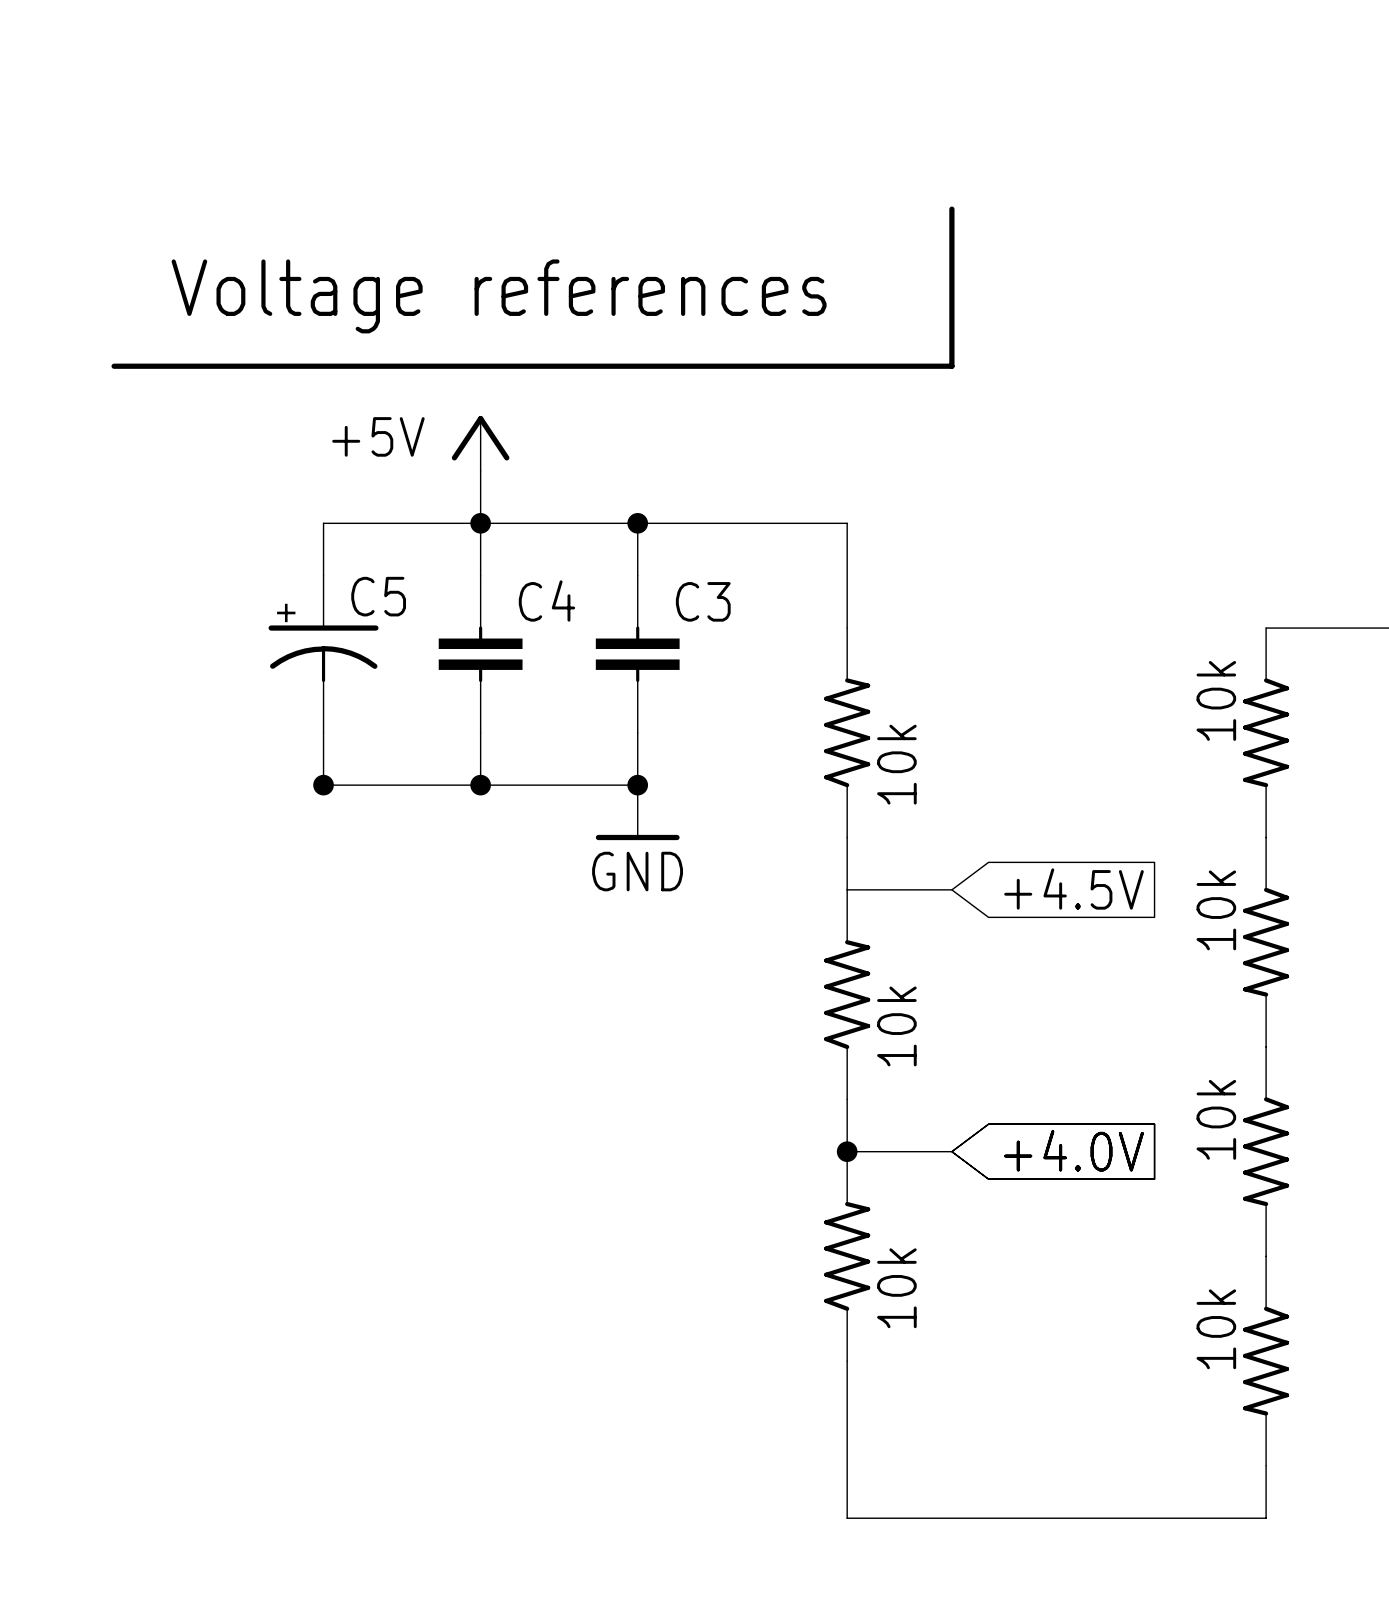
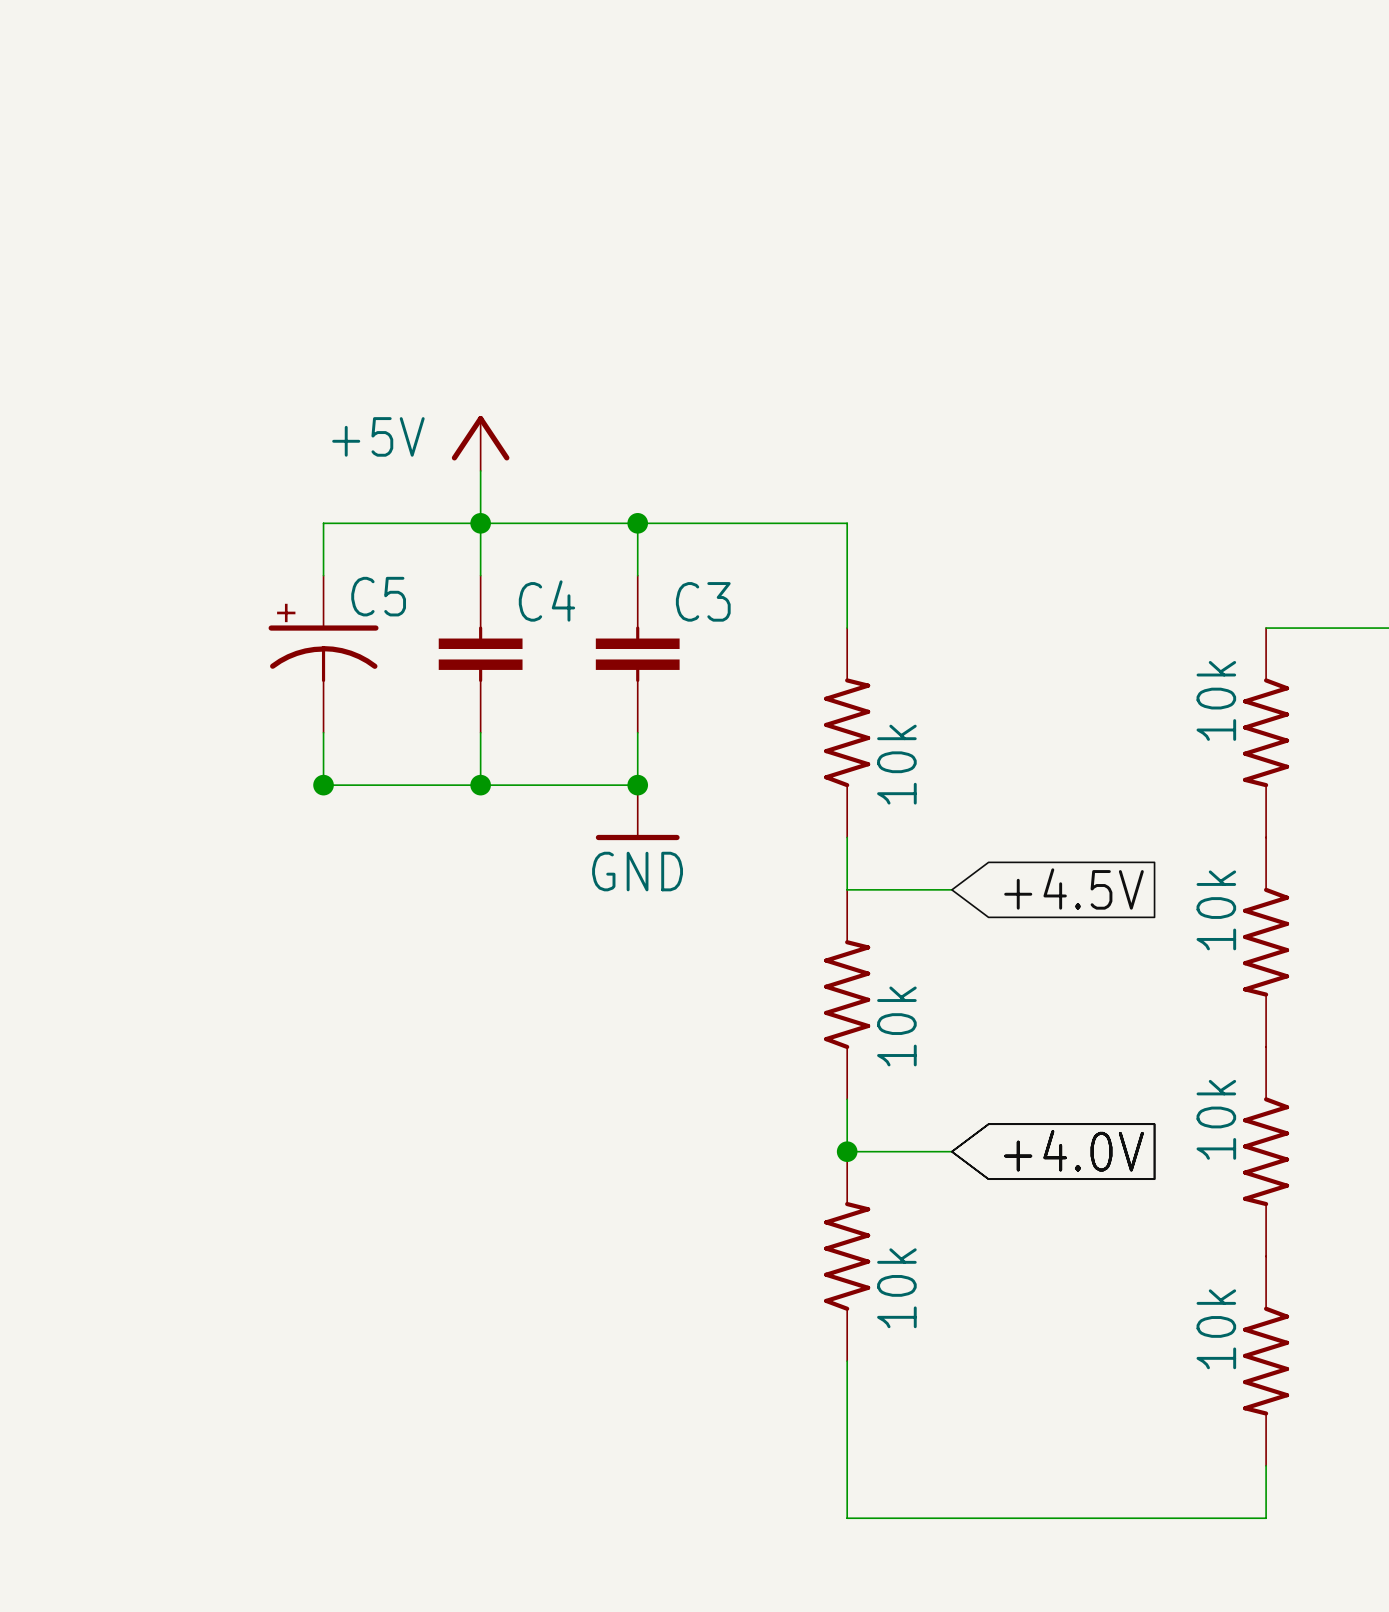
line: (951, 209) (951, 366) (114, 366) -> none
text: Voltage references (499, 296) -> none

